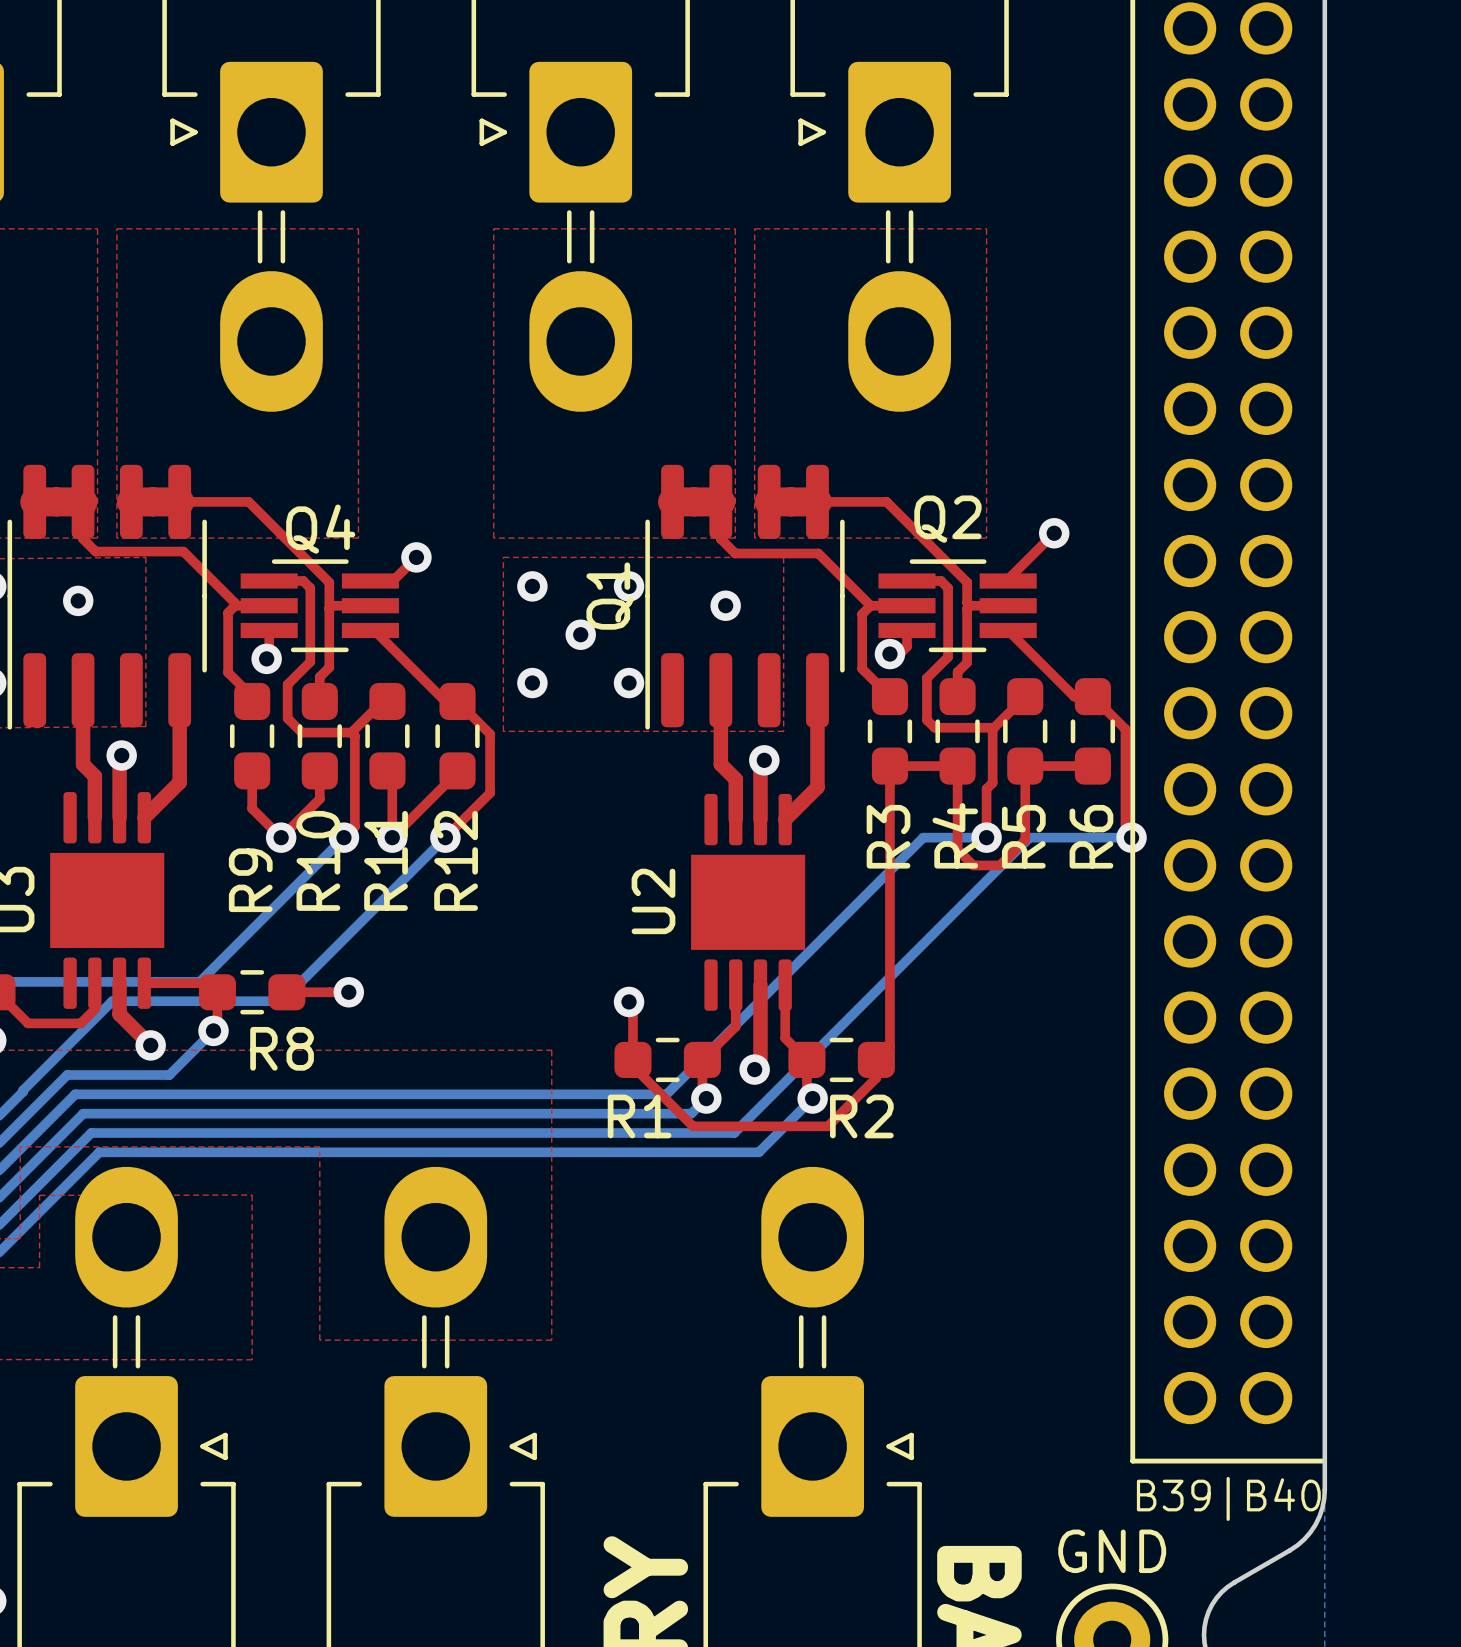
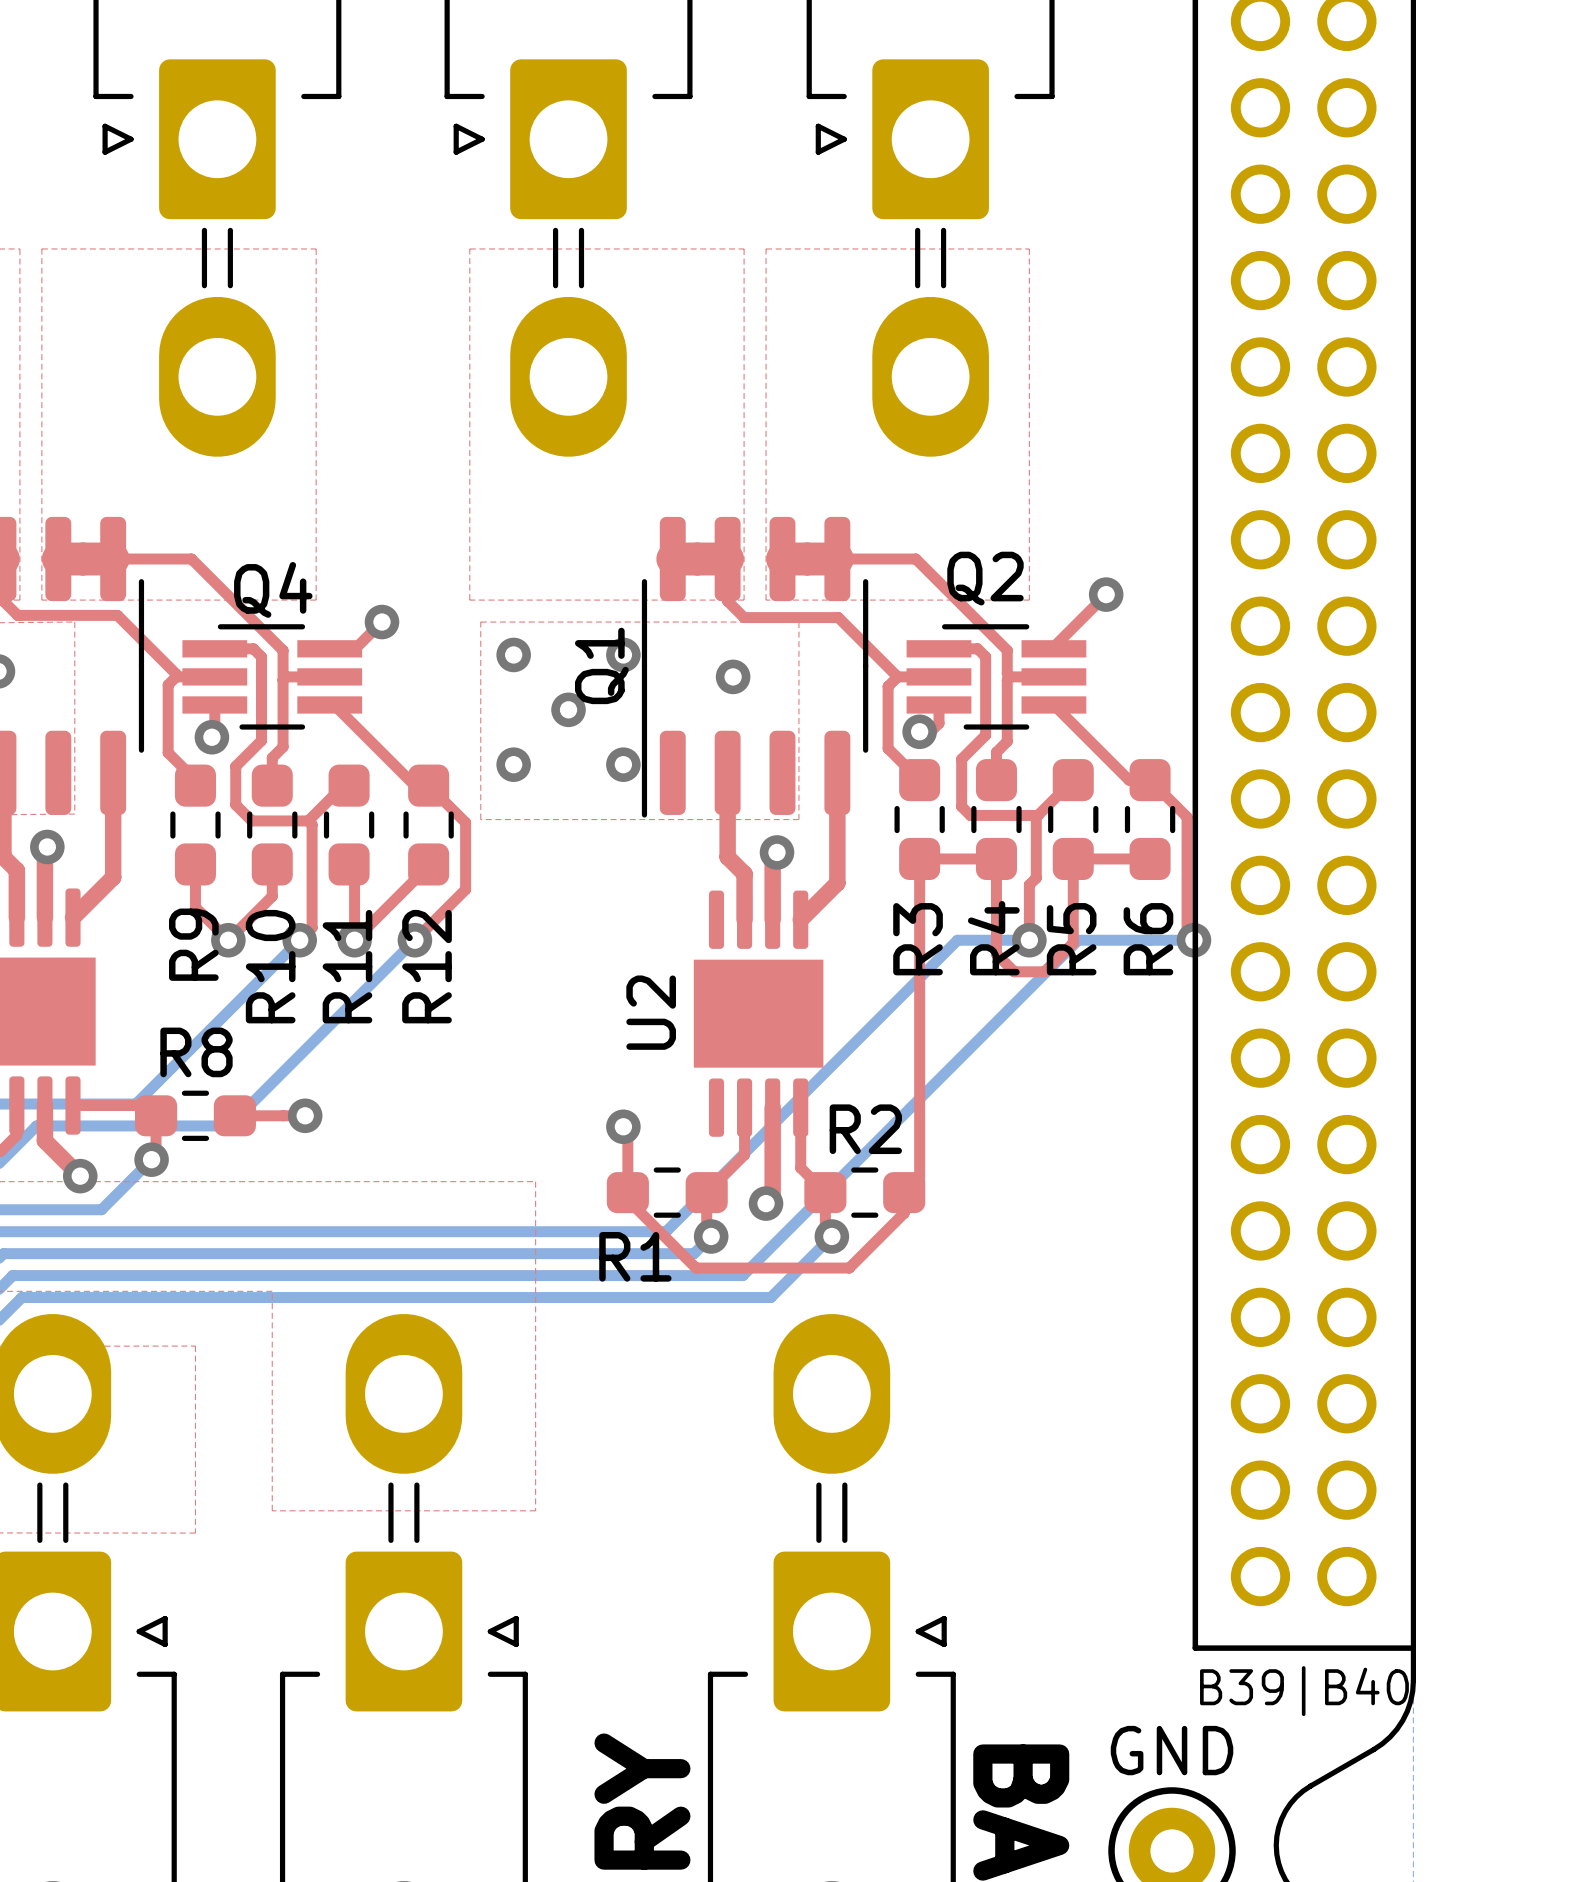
R9 name position: R9 (250, 880) -> R9 (193, 944)
R8 name position: R8 (282, 1048) -> R8 (196, 1052)
R2 name position: R2 (861, 1116) -> R2 (865, 1129)

